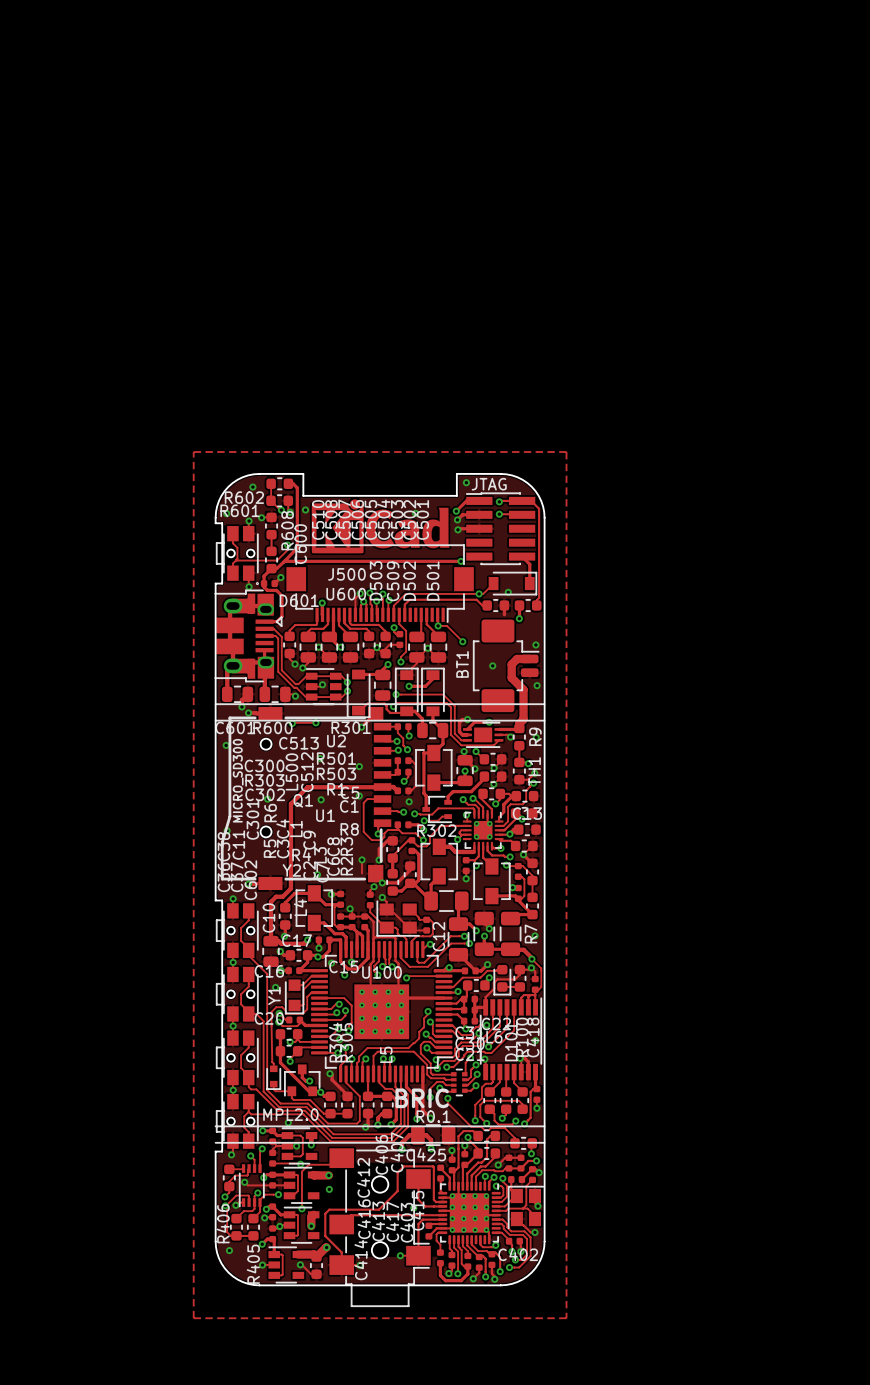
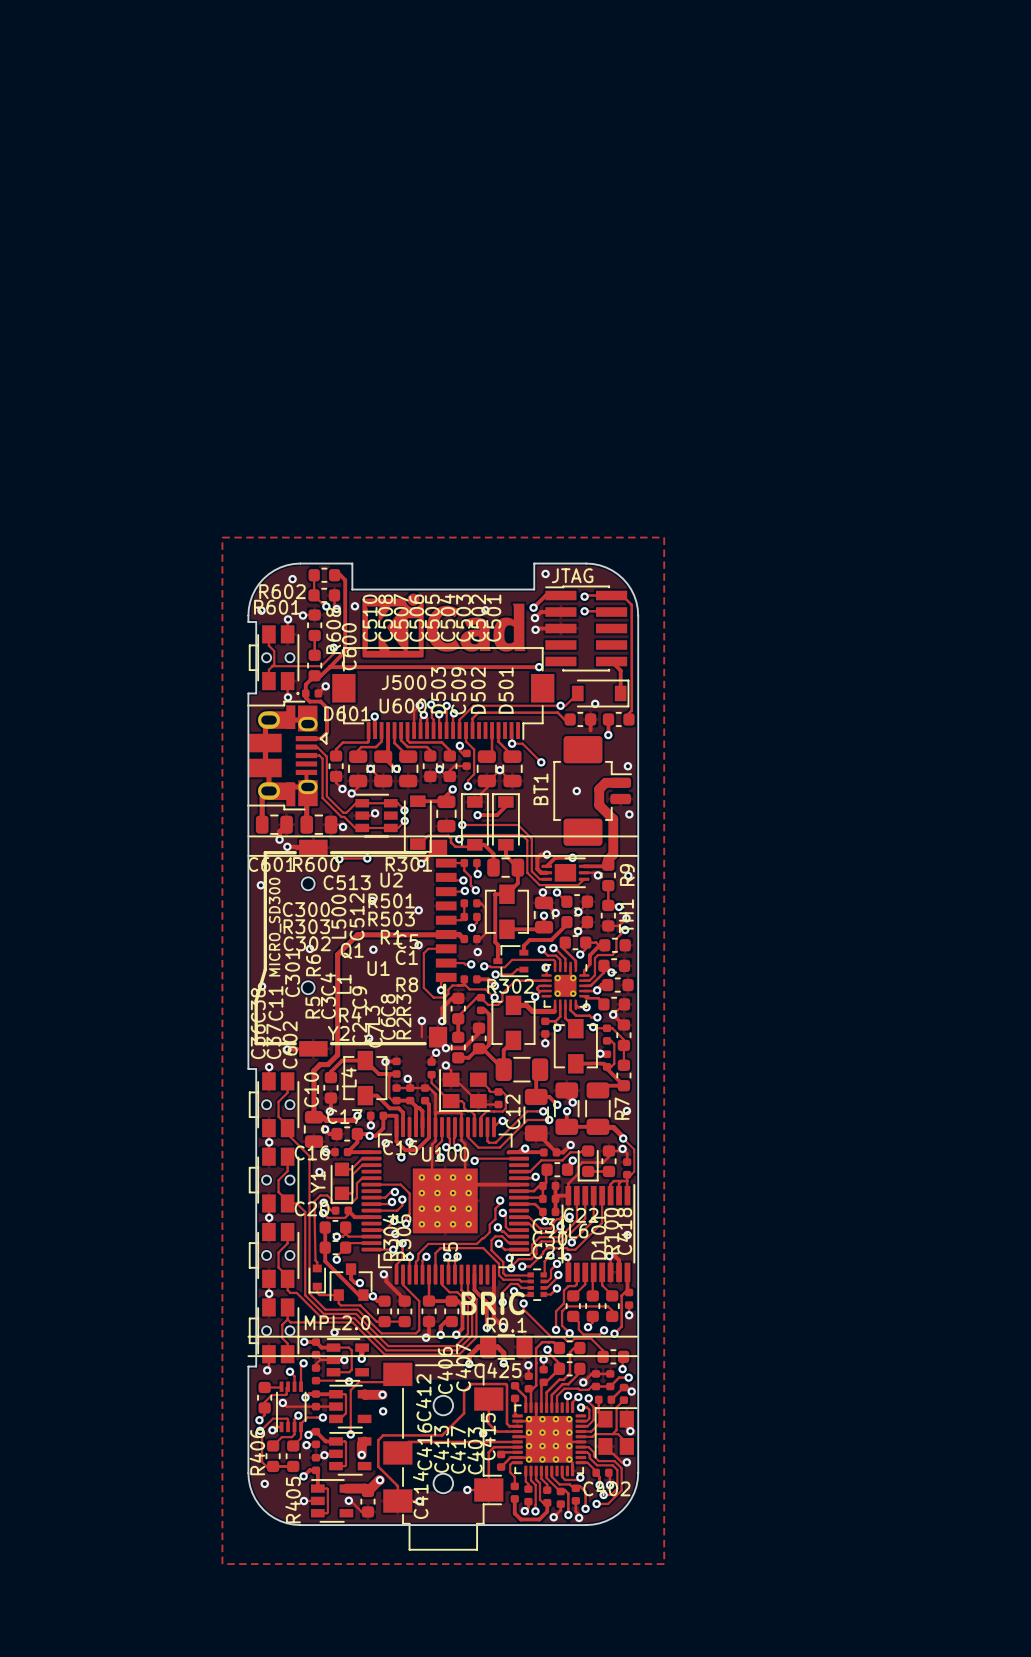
C13 name: C13 (527, 813) -> none

